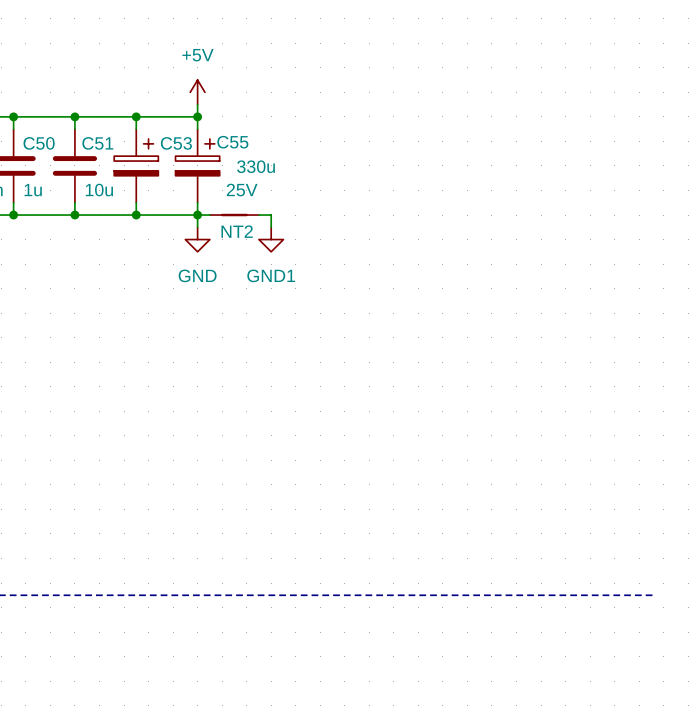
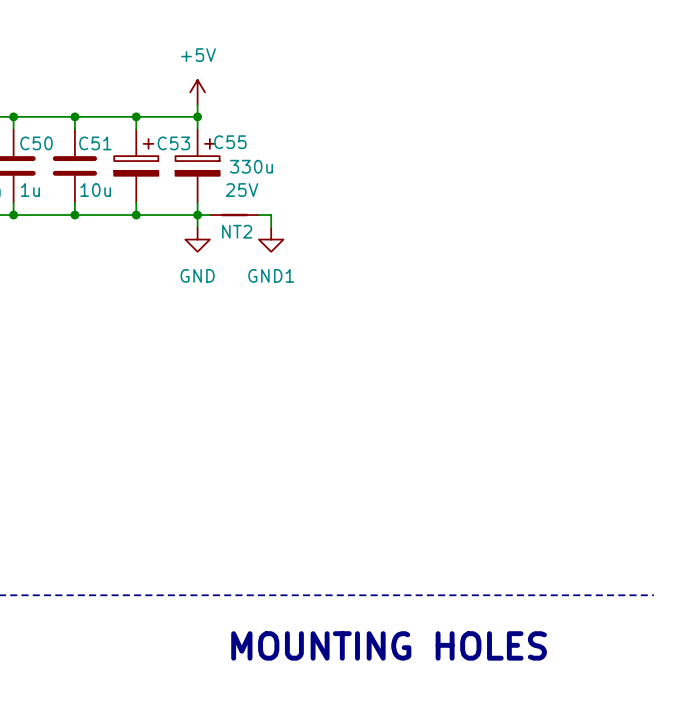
text: none -> MOUNTING HOLES (389, 645)

